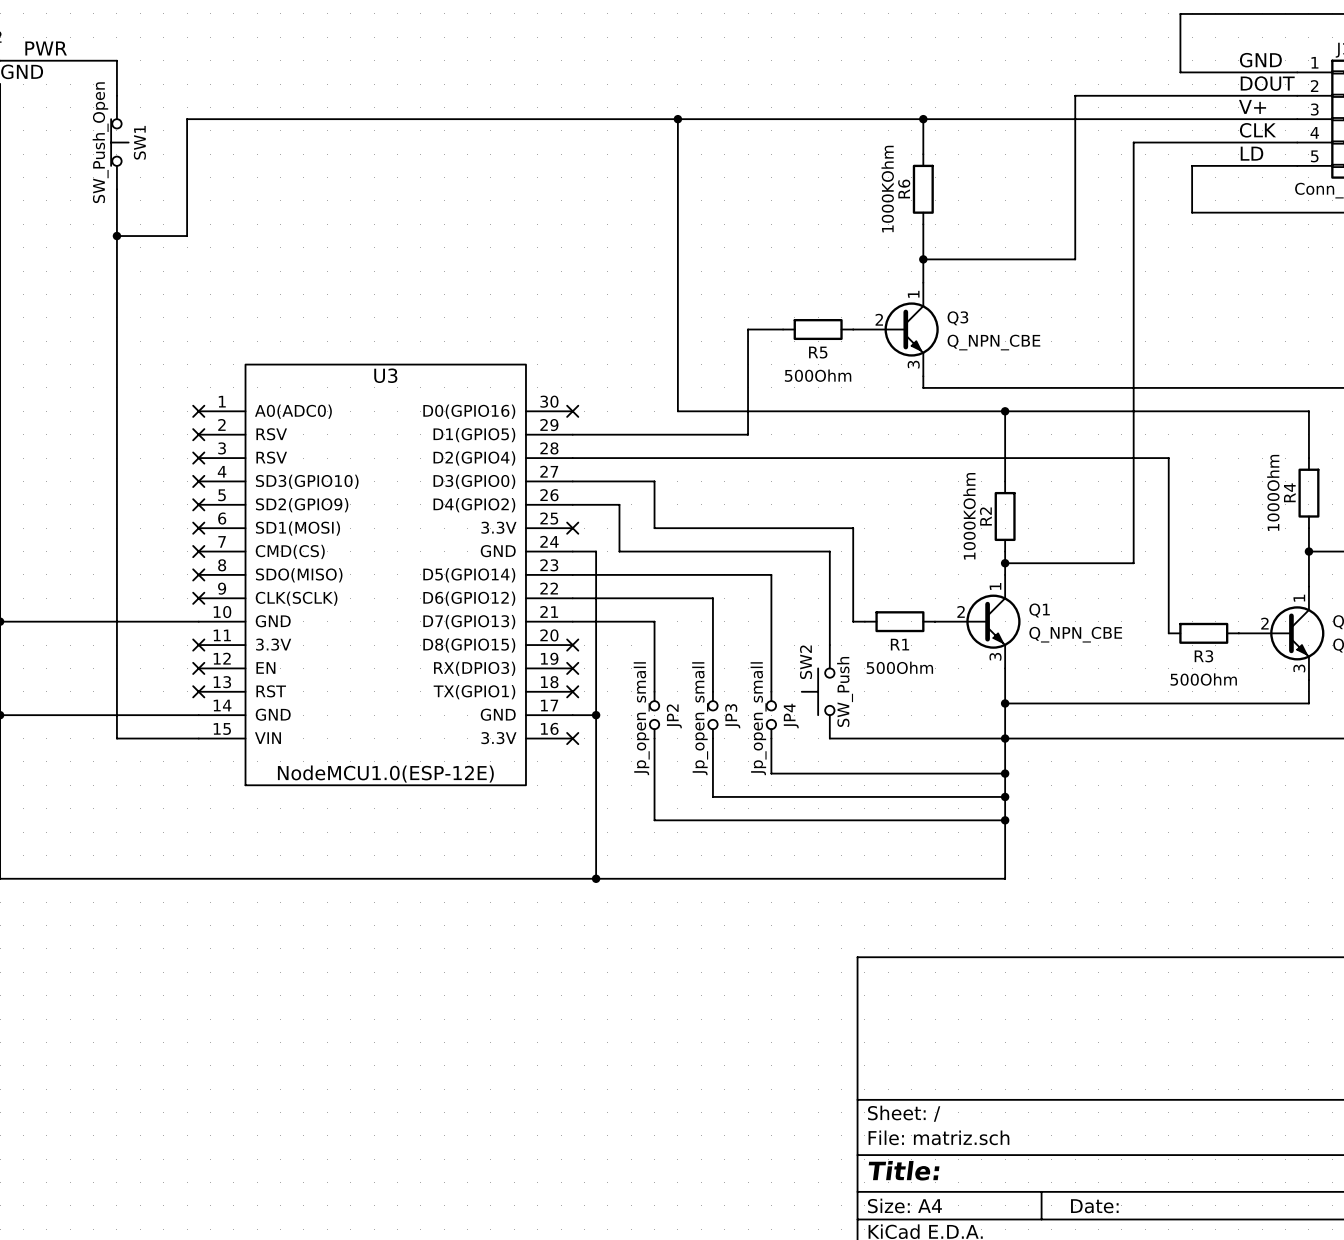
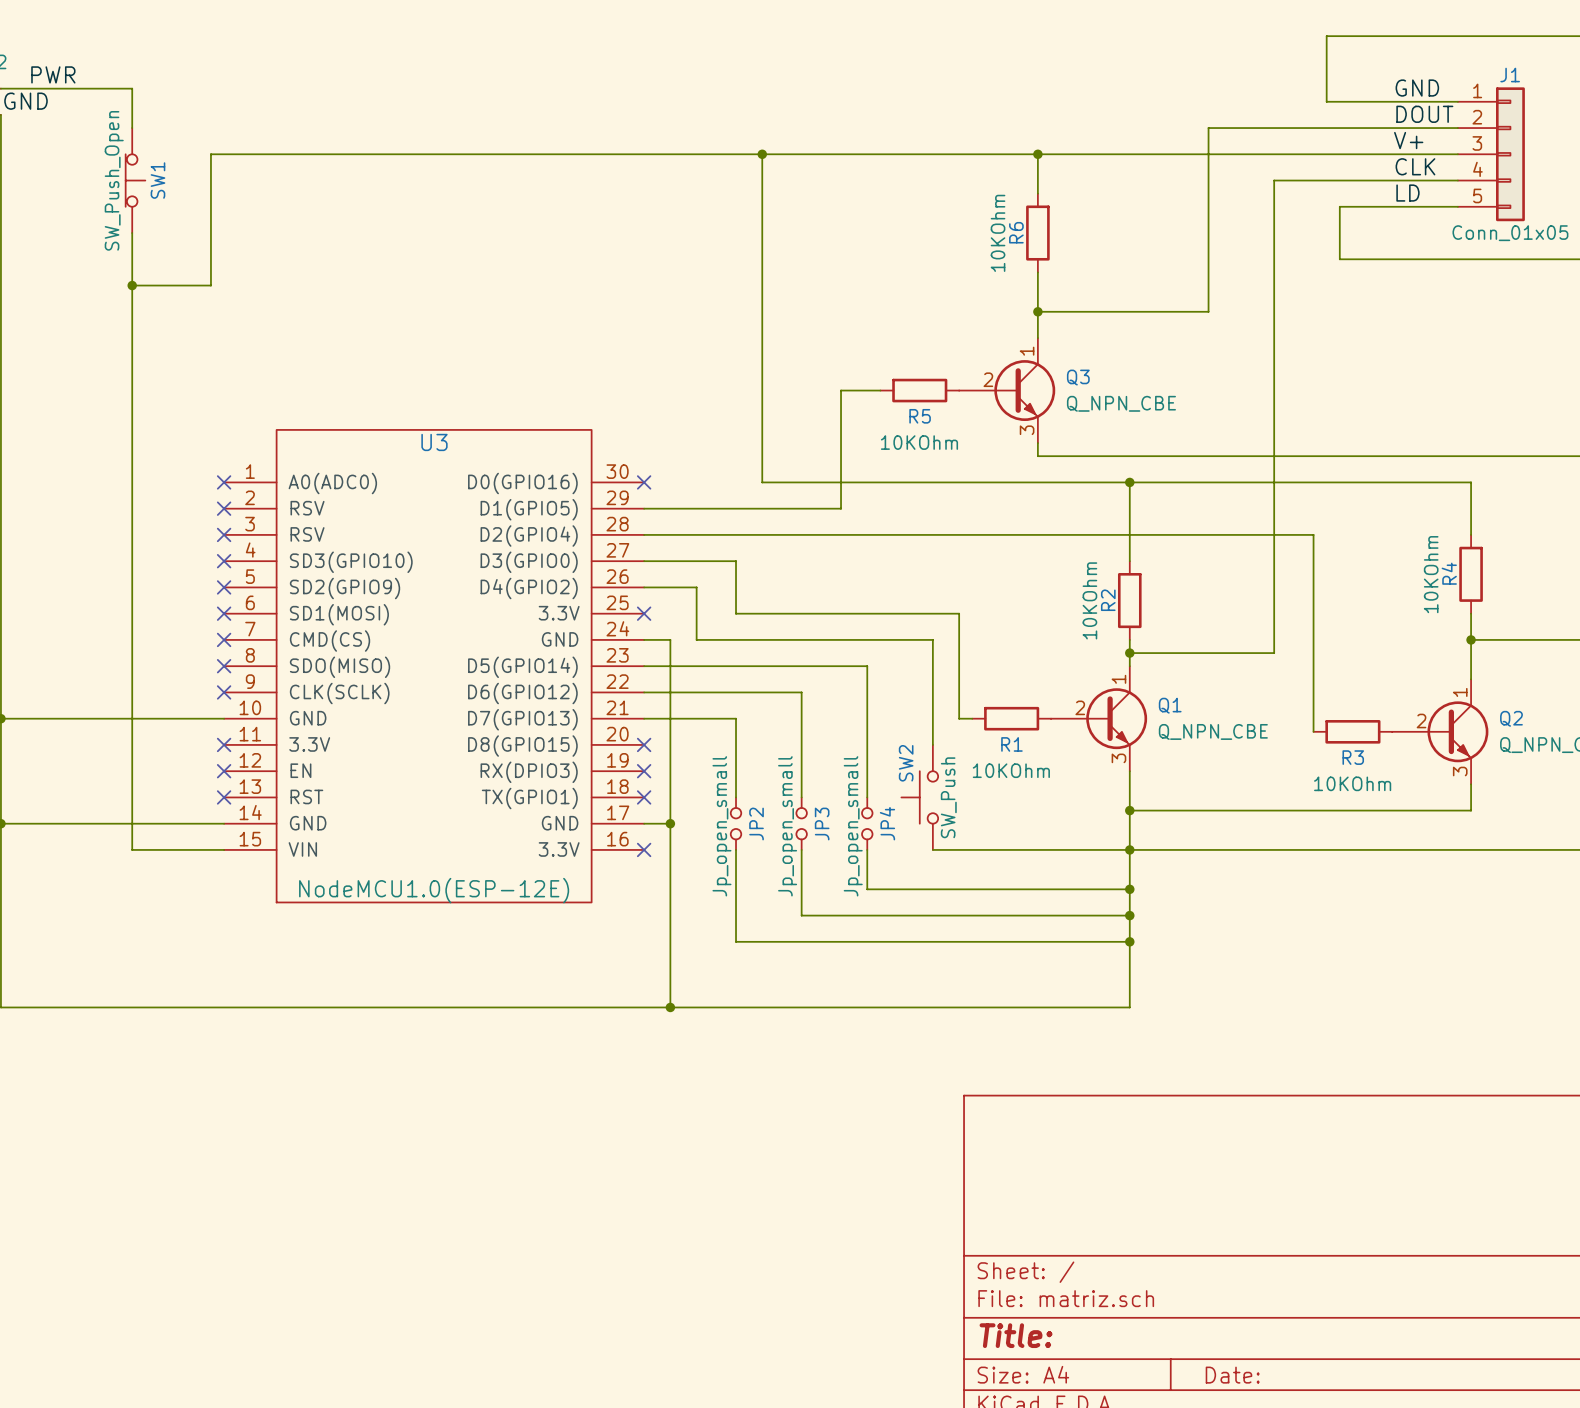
R6 value: 1000KOhm (887, 189) -> 10KOhm (998, 233)
R5 value: 500Ohm (818, 375) -> 10KOhm (919, 442)
R4 value: 1000Ohm (1273, 492) -> 10KOhm (1431, 574)
R2 value: 1000KOhm (969, 516) -> 10KOhm (1089, 600)
R1 value: 500Ohm (899, 667) -> 10KOhm (1011, 770)
R3 value: 500Ohm (1203, 679) -> 10KOhm (1352, 783)

